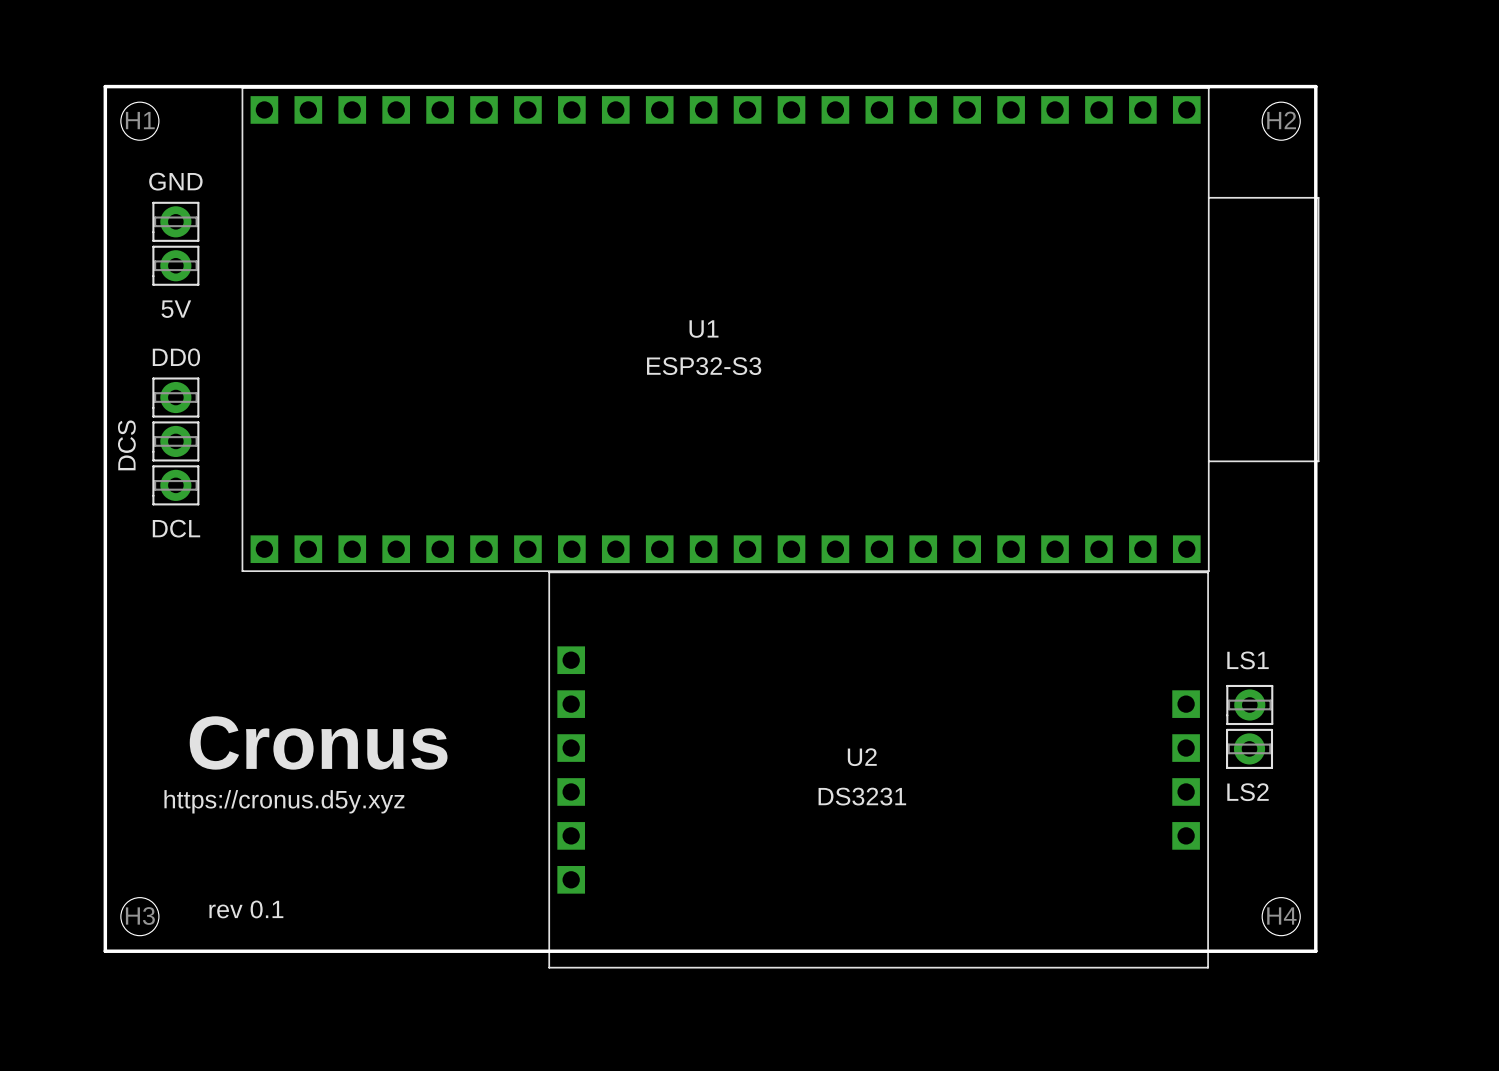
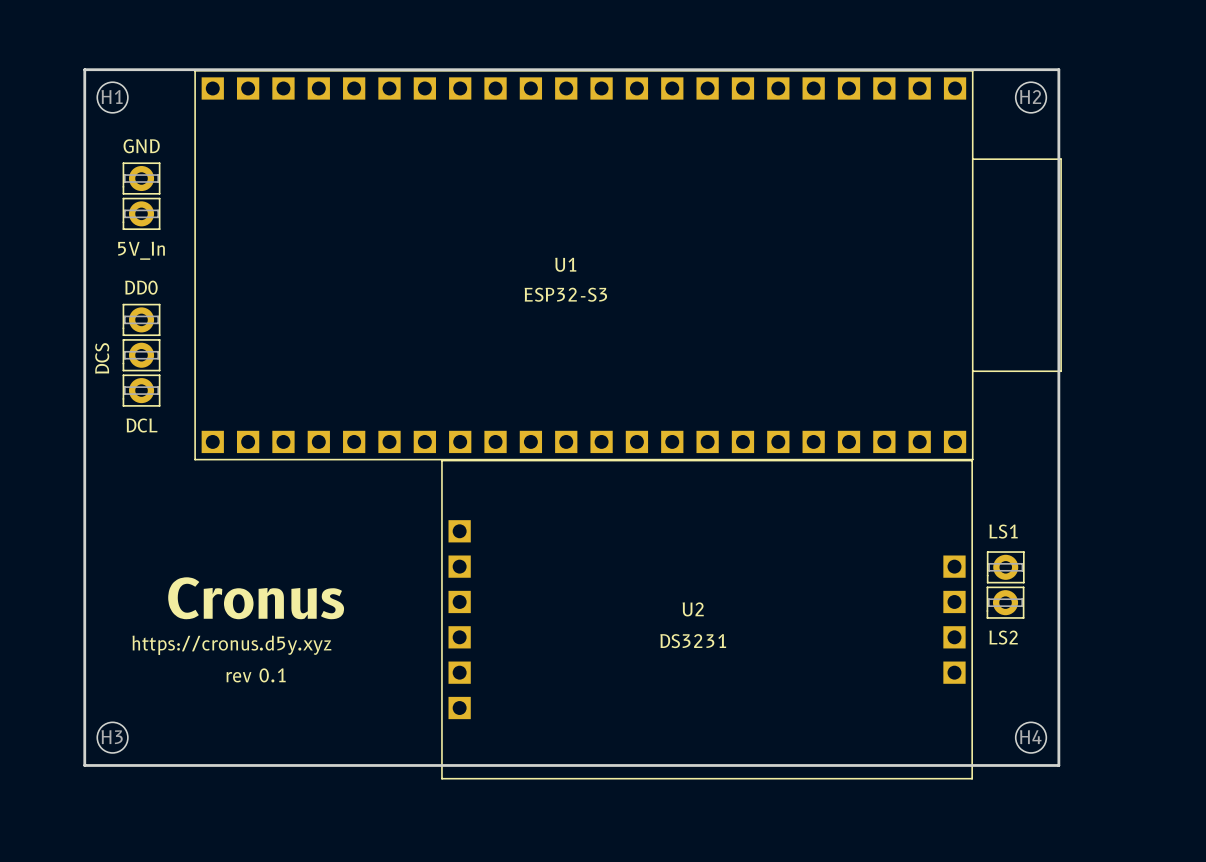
part value: 5V (176, 309) -> 5V_In (141, 250)
text position: rev 0.1 (246, 909) -> rev 0.1 (256, 675)

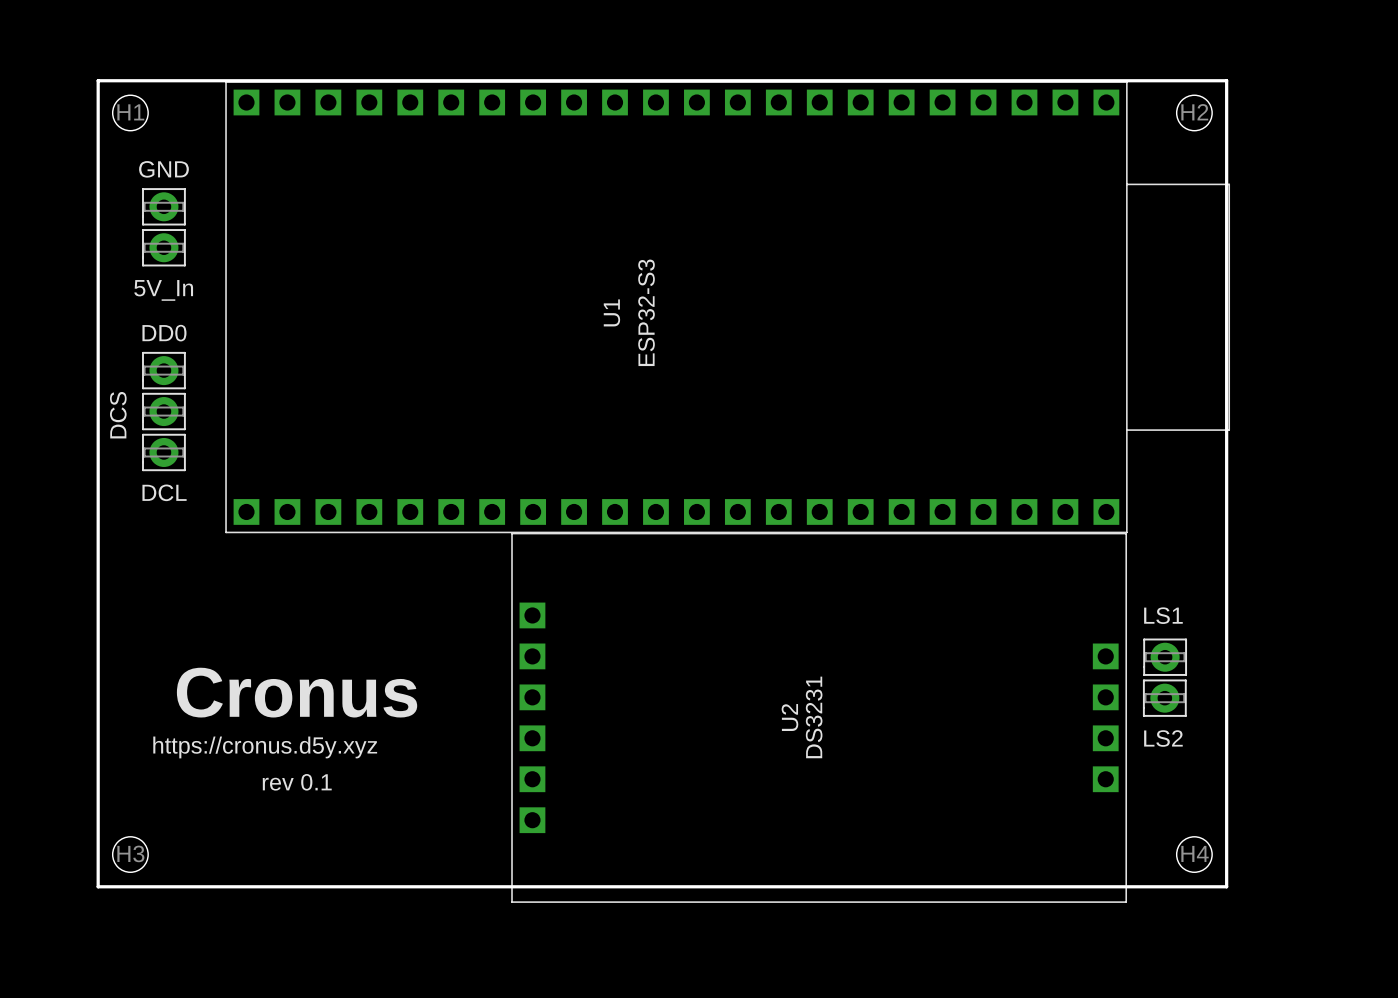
U1 name rotation: 0° (565, 264) -> 90° counterclockwise (611, 312)
U1 name position: U1 (565, 264) -> U1 (611, 312)
U1 value rotation: 0° (565, 294) -> 90° counterclockwise (646, 312)
U2 name rotation: 0° (693, 609) -> 90° counterclockwise (789, 717)
U2 value rotation: 0° (693, 641) -> 90° counterclockwise (814, 717)

